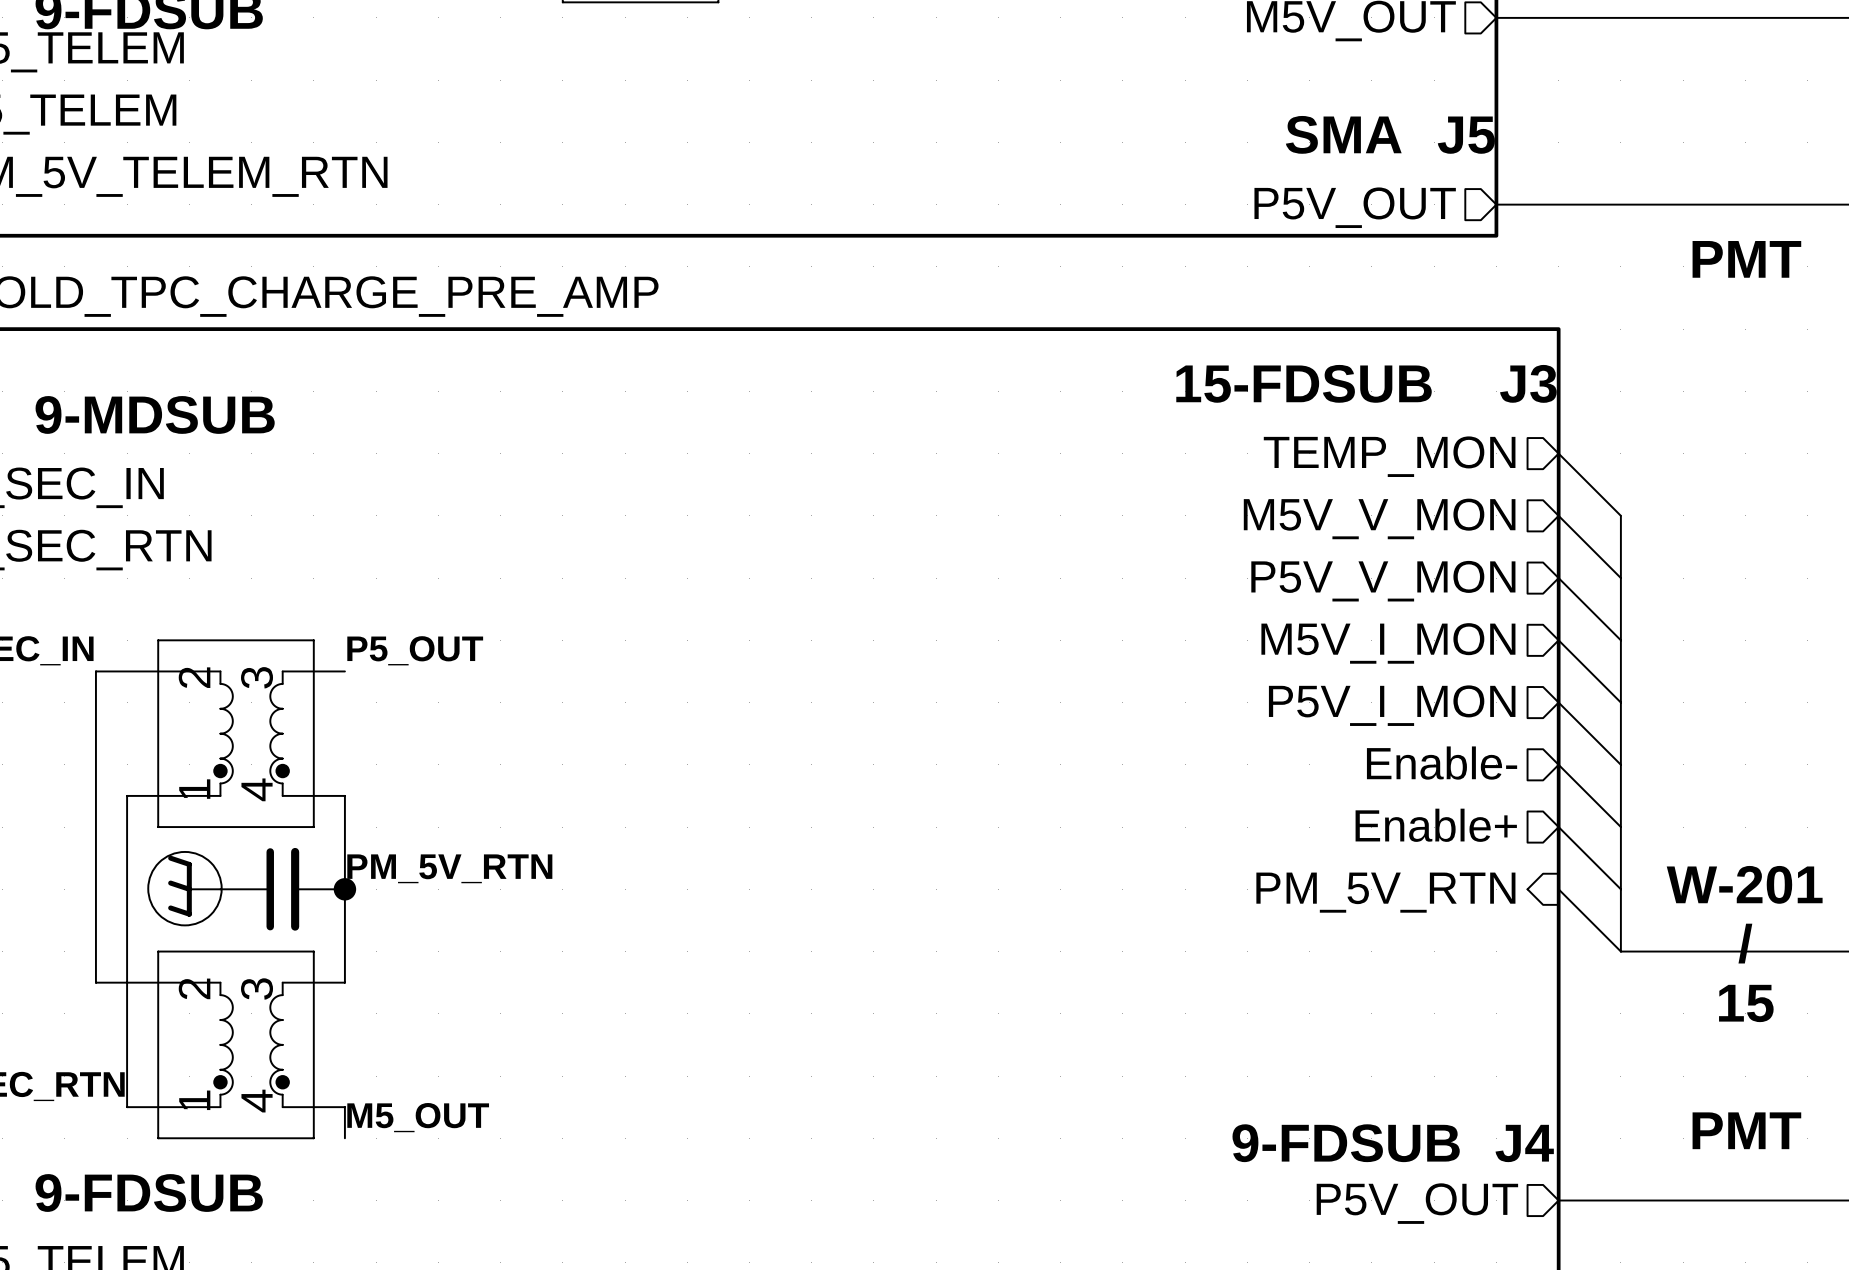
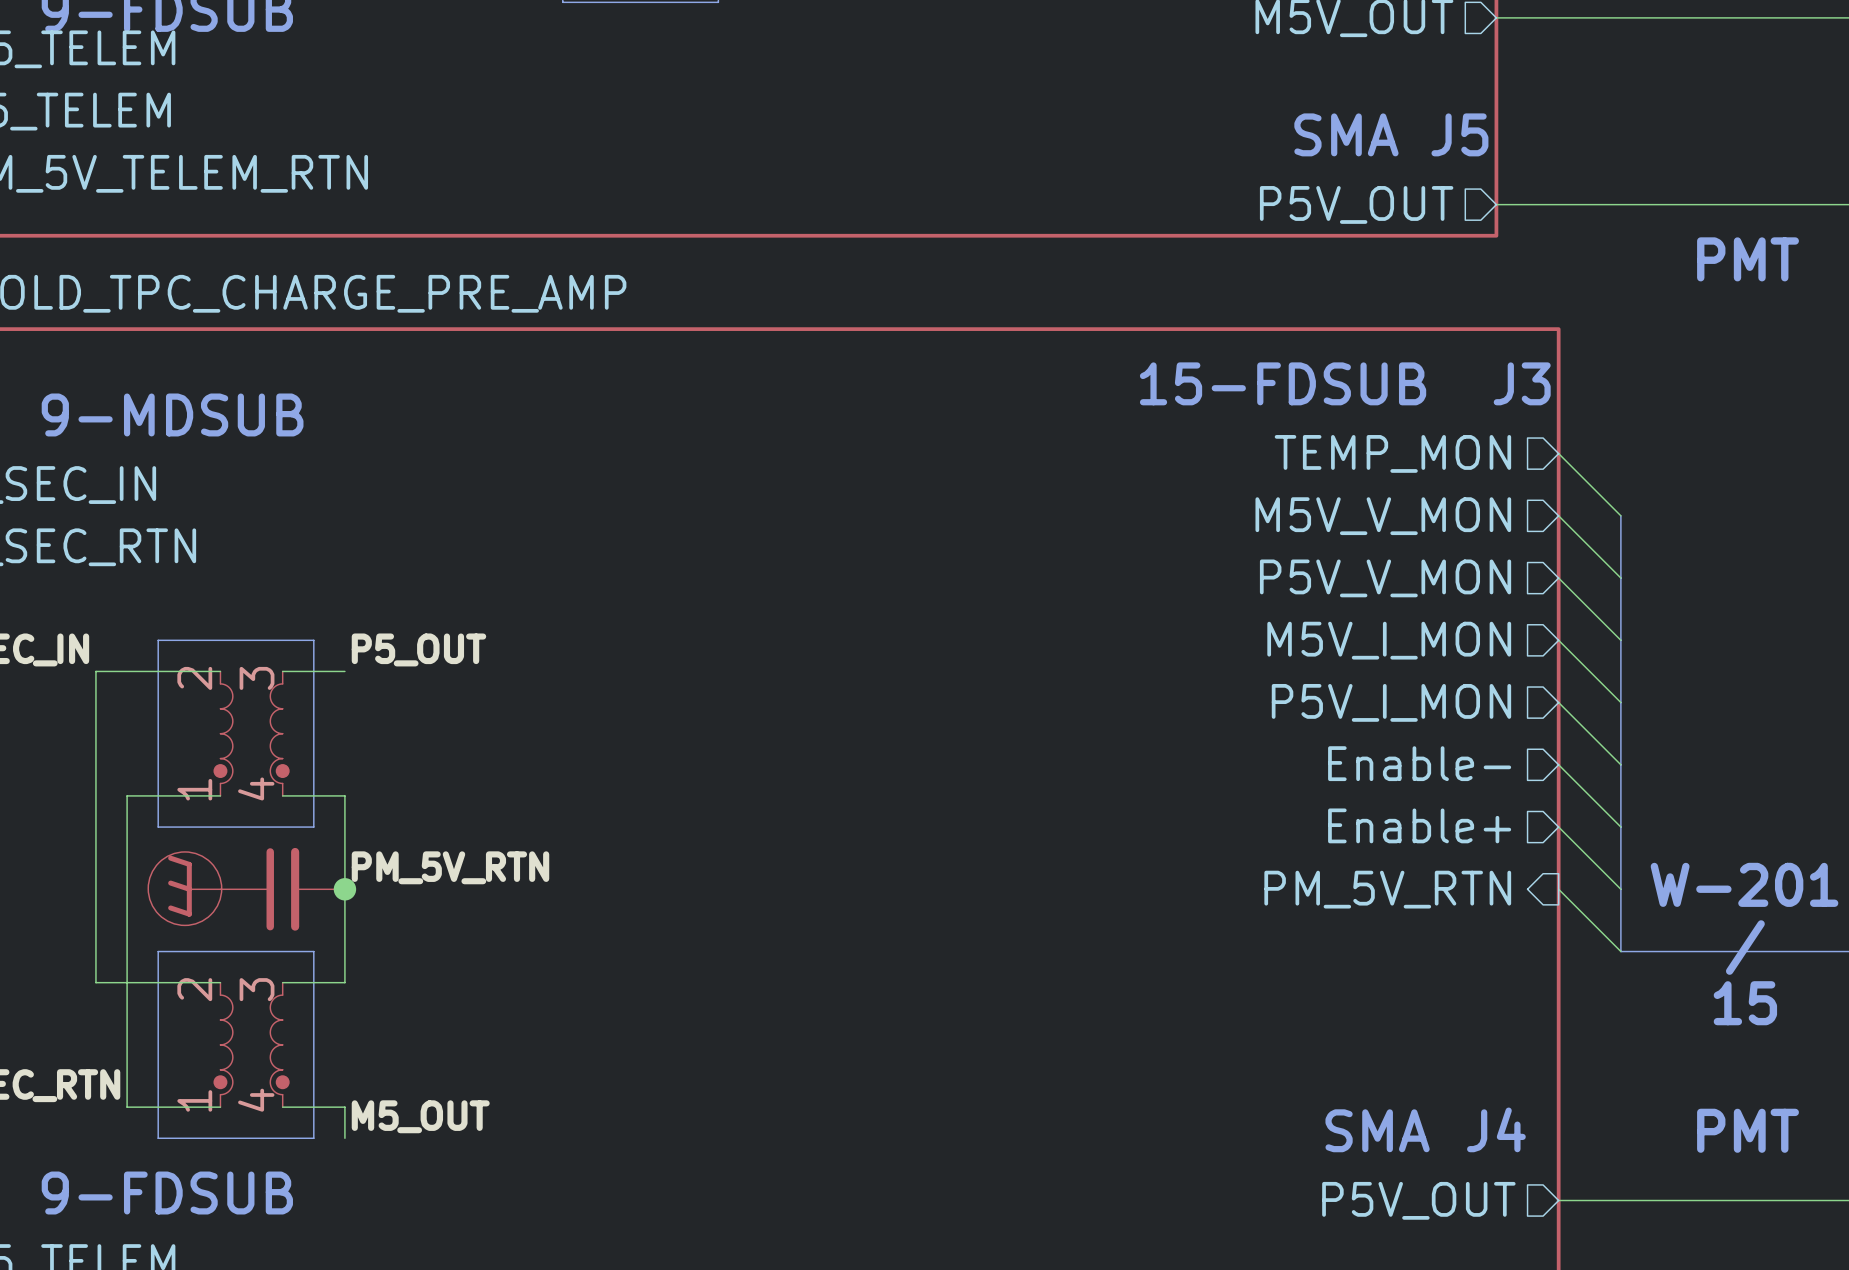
text: none -> SMA (1377, 1130)
text: 9-FDSUB (1346, 1143) -> none
text position: J4 (1524, 1143) -> J4 (1496, 1129)

